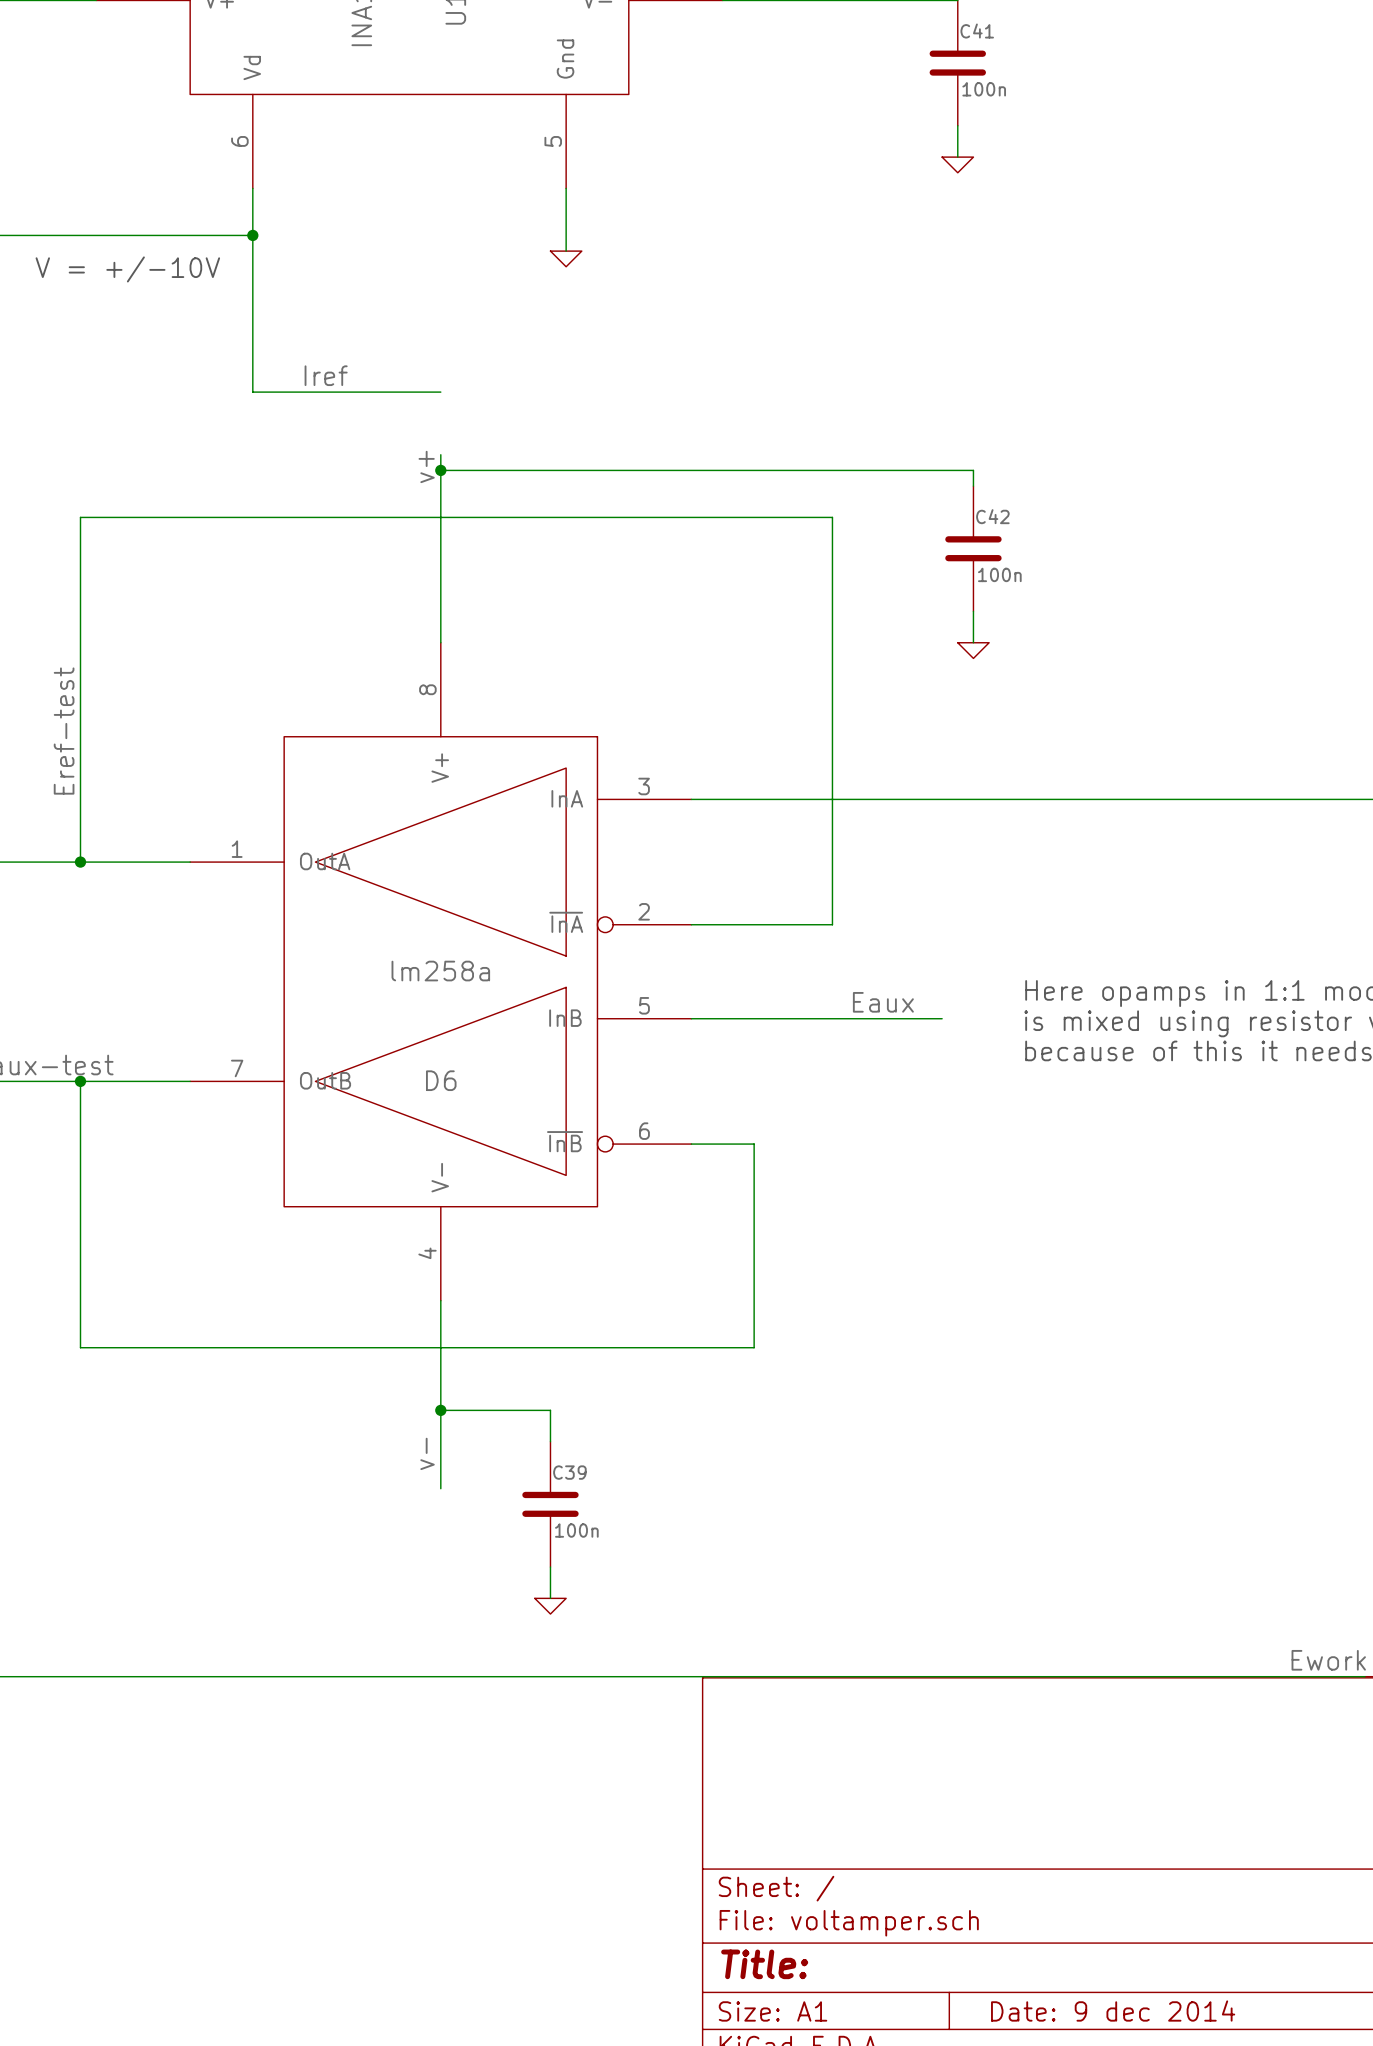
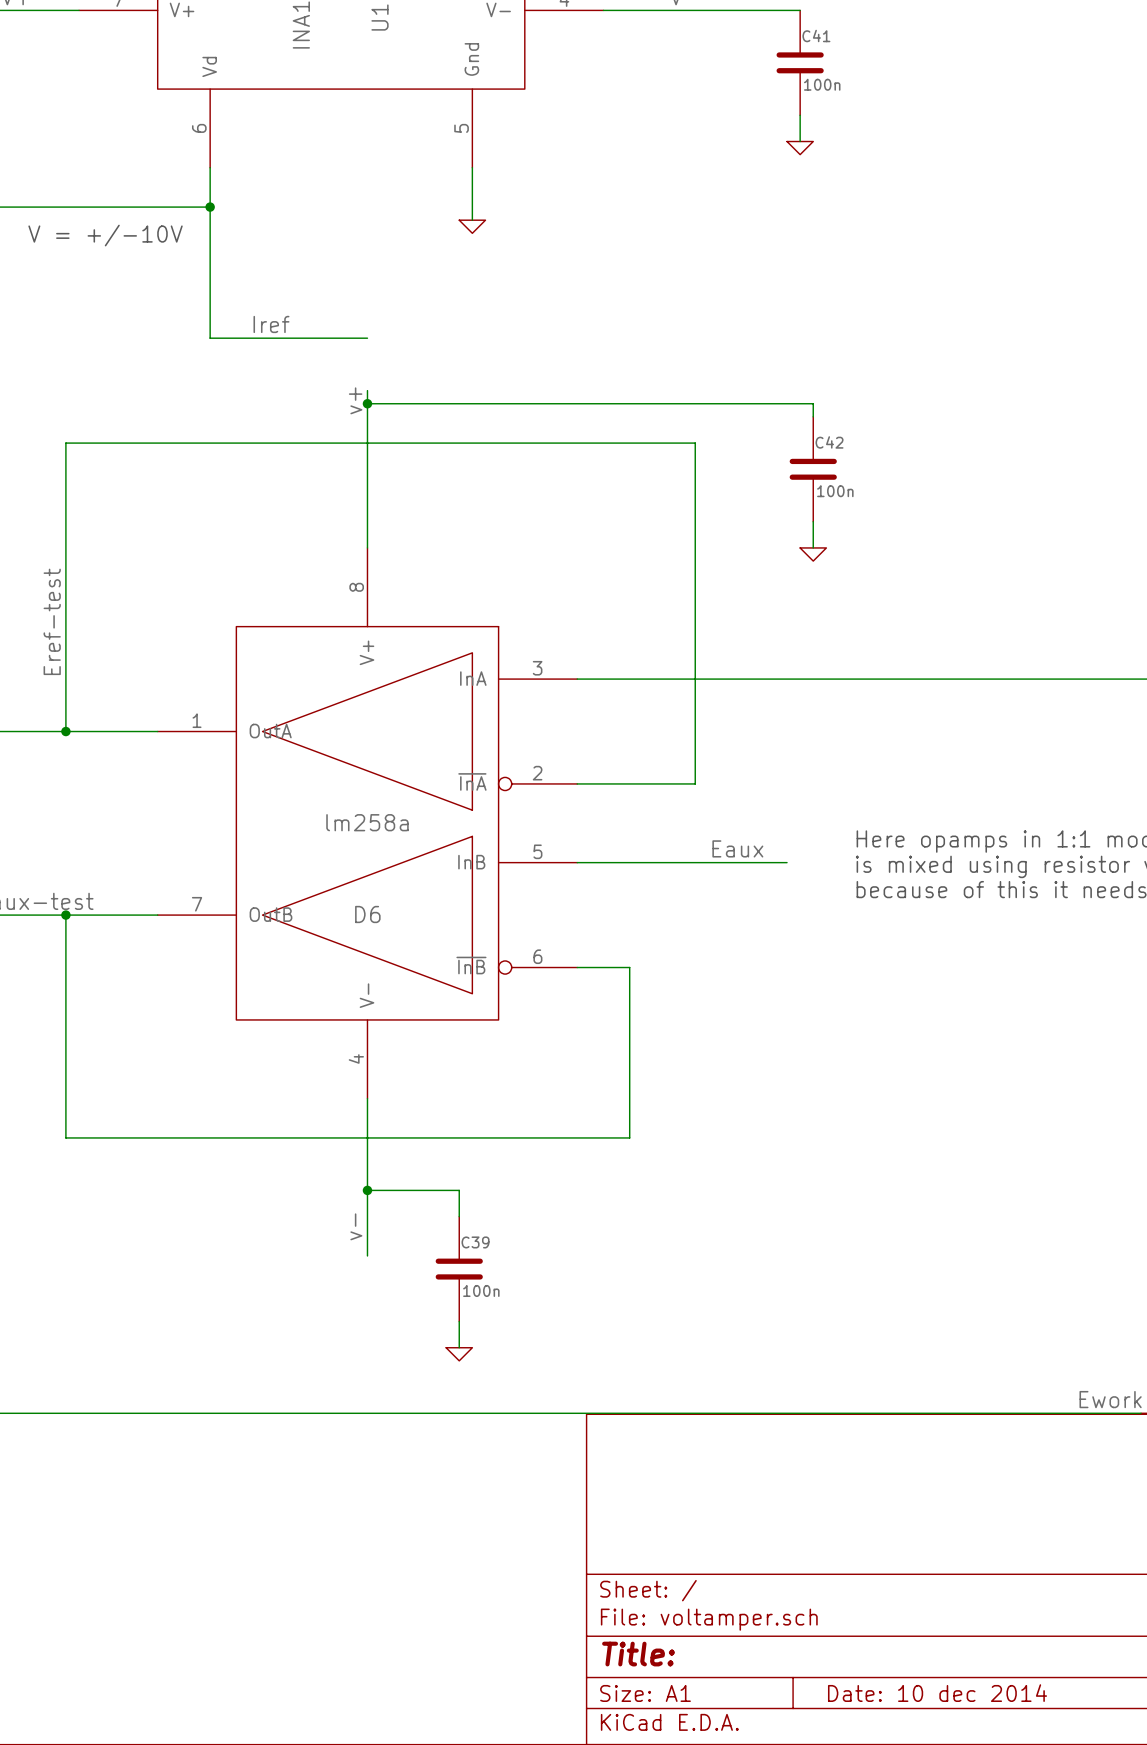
title block: Date: 9 dec 2014 (1113, 2011) -> Date: 10 dec 2014 (937, 1693)

